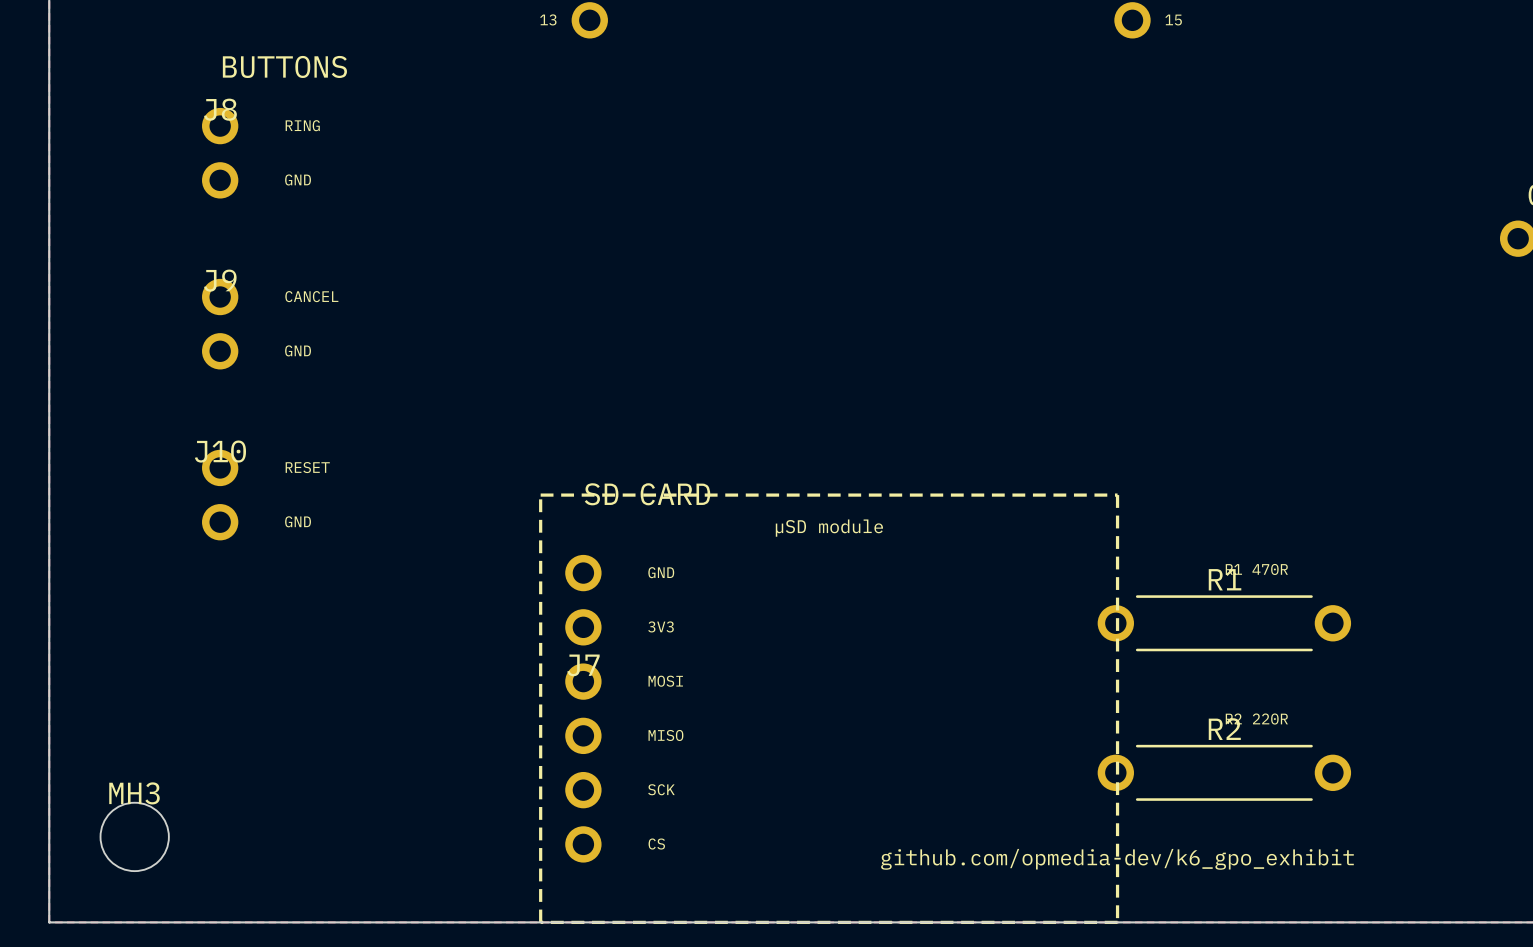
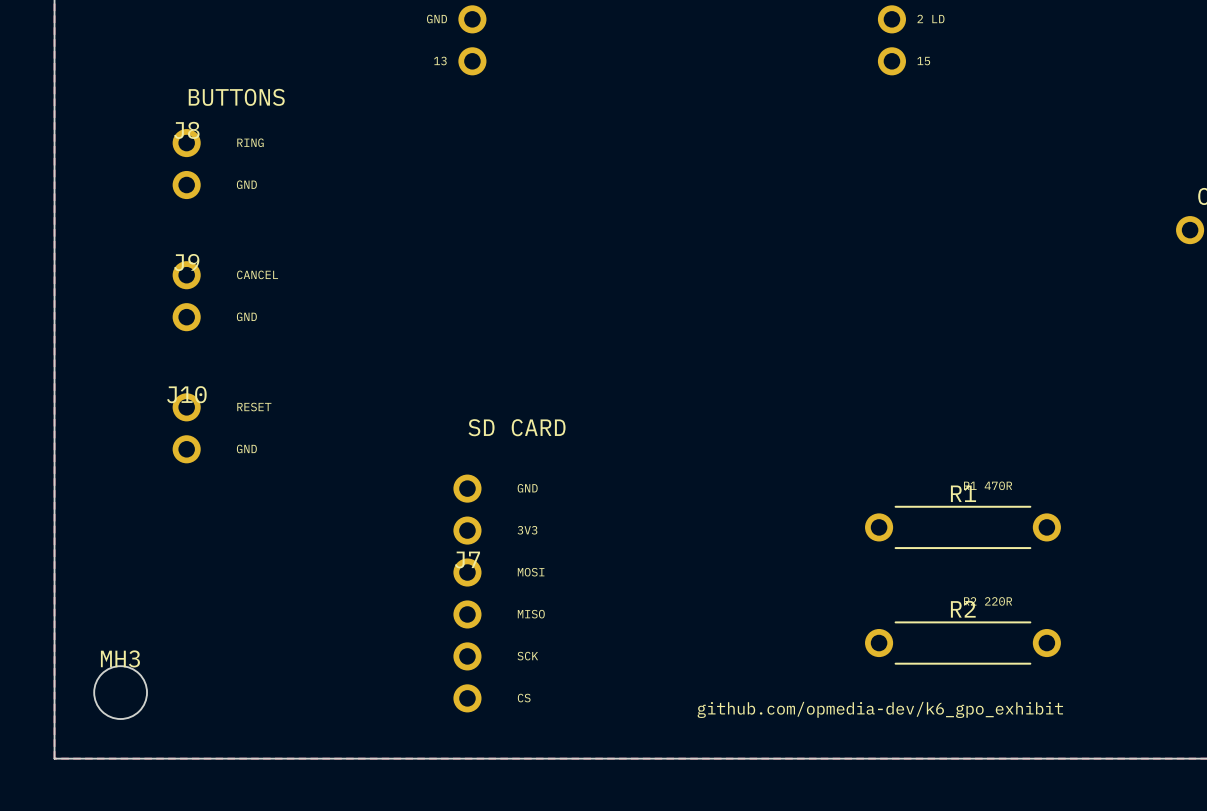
line: (540, 495) (1117, 495) (1117, 922) (540, 922) (540, 495) -> none
text: µSD module (829, 528) -> none

